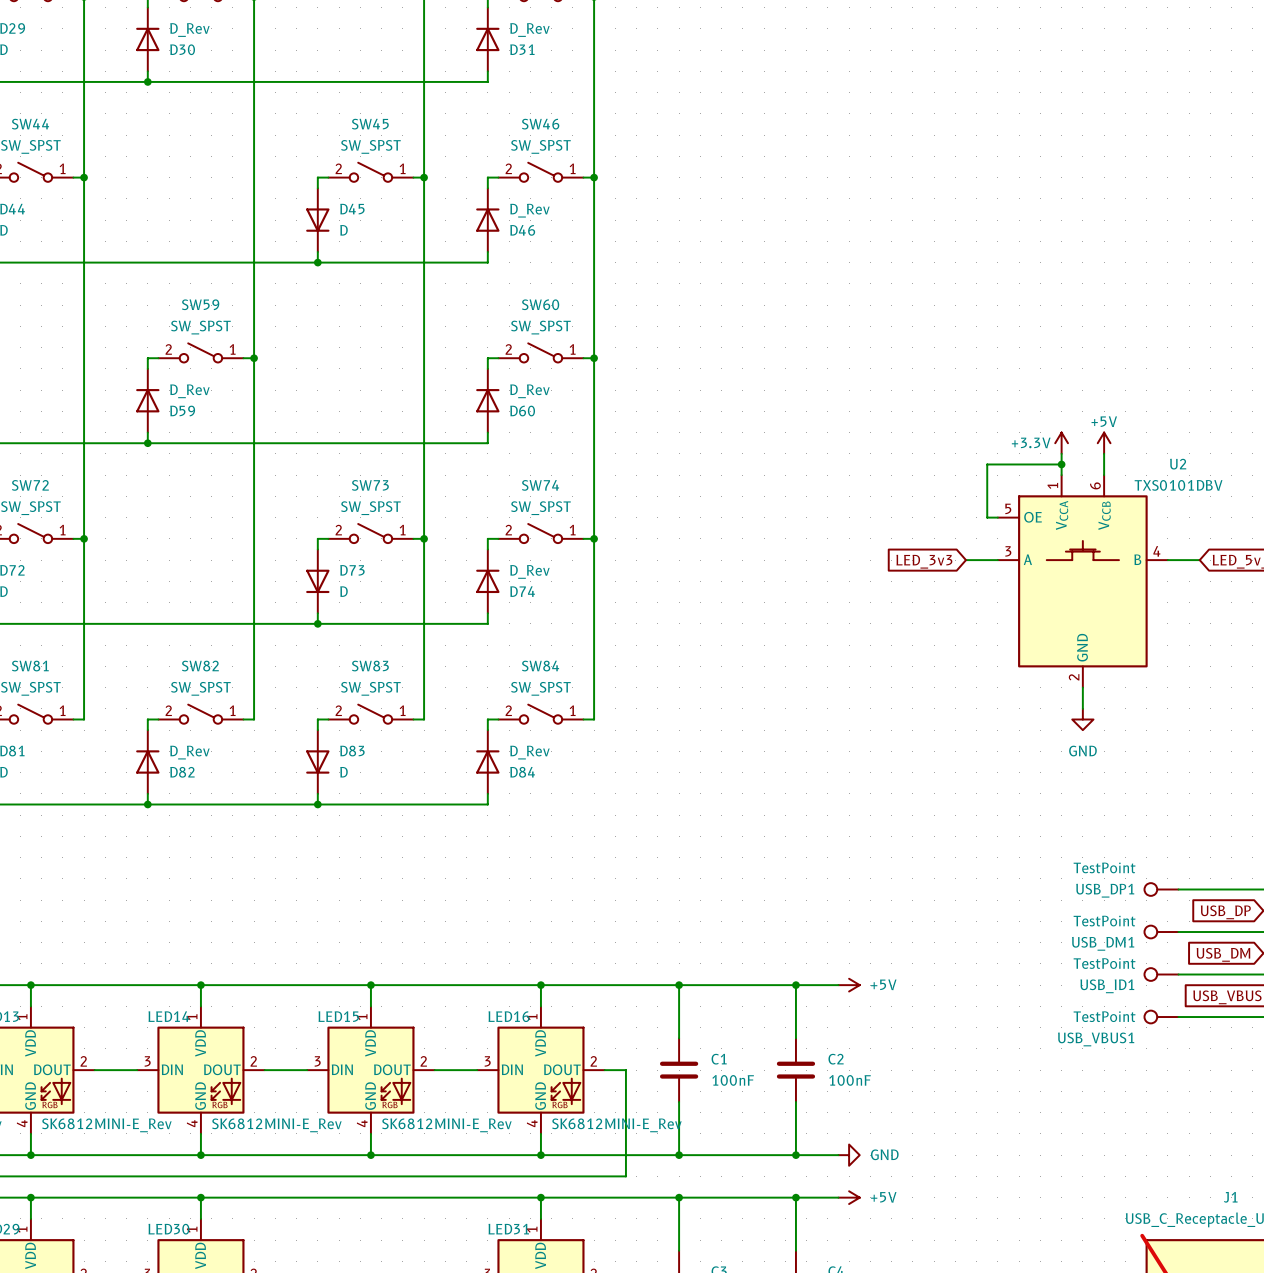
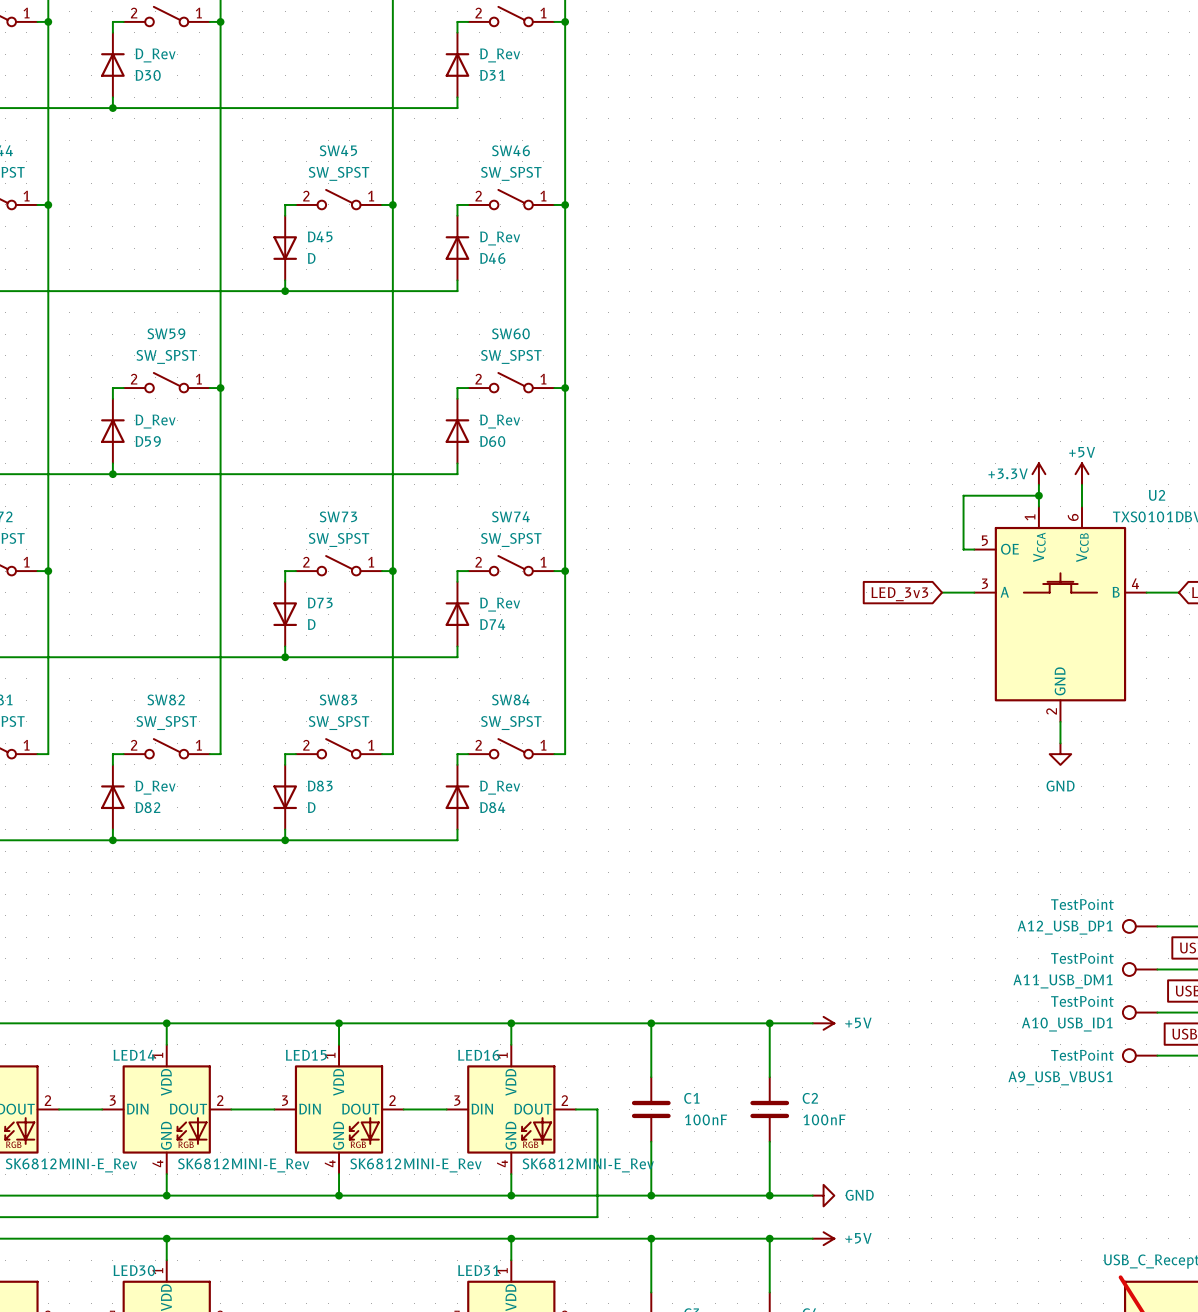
USB_DP1 name: USB_DP1 (1105, 890) -> A12_USB_DP1 (1065, 927)
USB_DM1 name: USB_DM1 (1103, 943) -> A11_USB_DM1 (1062, 981)
USB_ID1 name: USB_ID1 (1107, 986) -> A10_USB_ID1 (1067, 1024)
USB_VBUS1 name: USB_VBUS1 (1096, 1039) -> A9_USB_VBUS1 (1060, 1078)

